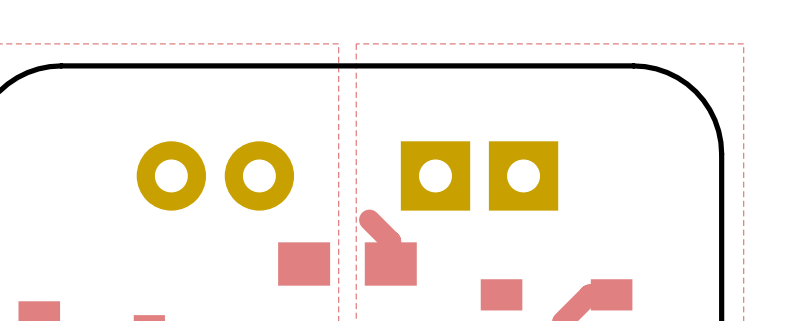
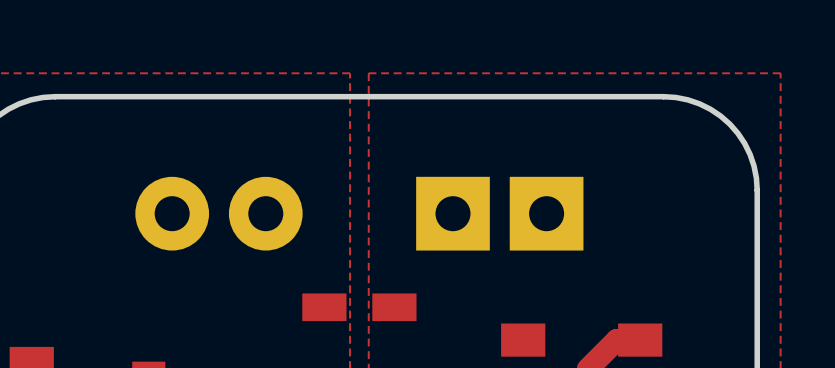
top track: (369, 219) (390, 241) (390, 264) -> none
part footprint: [278, 242, 417, 286] -> [302, 293, 417, 322]

